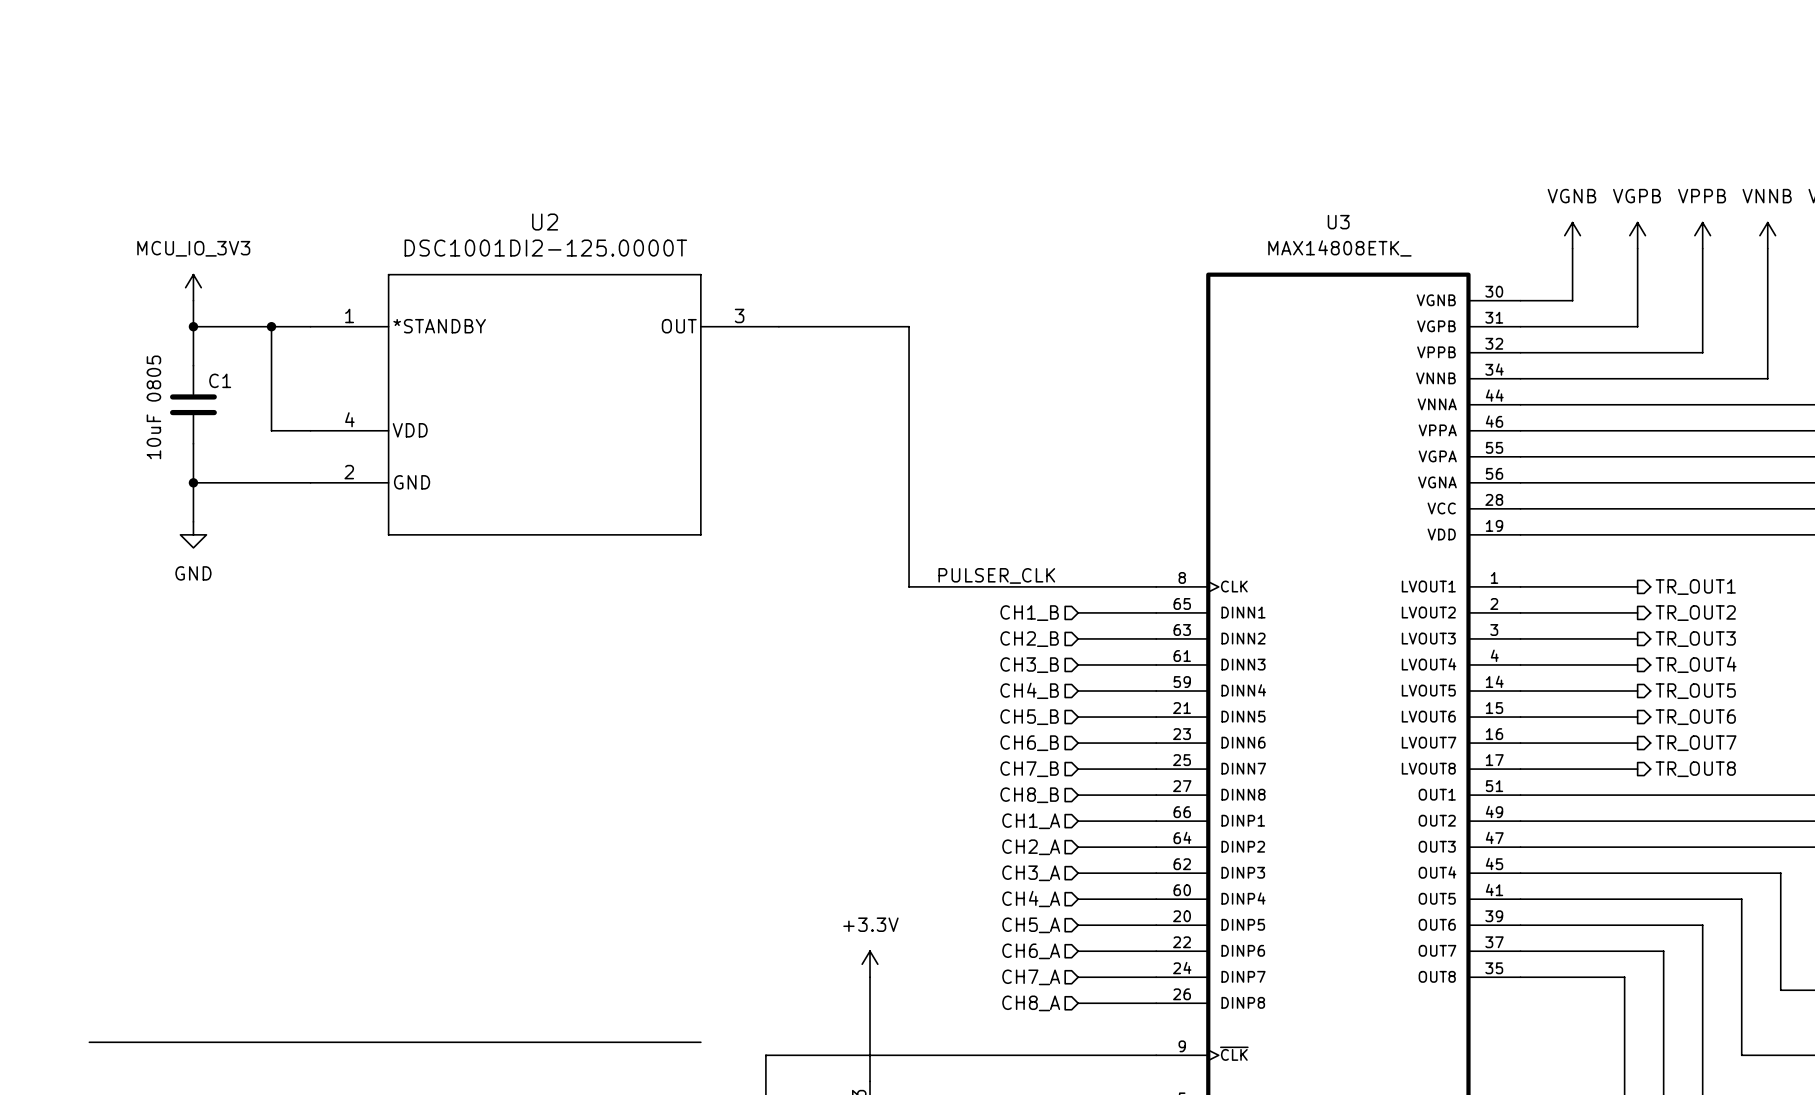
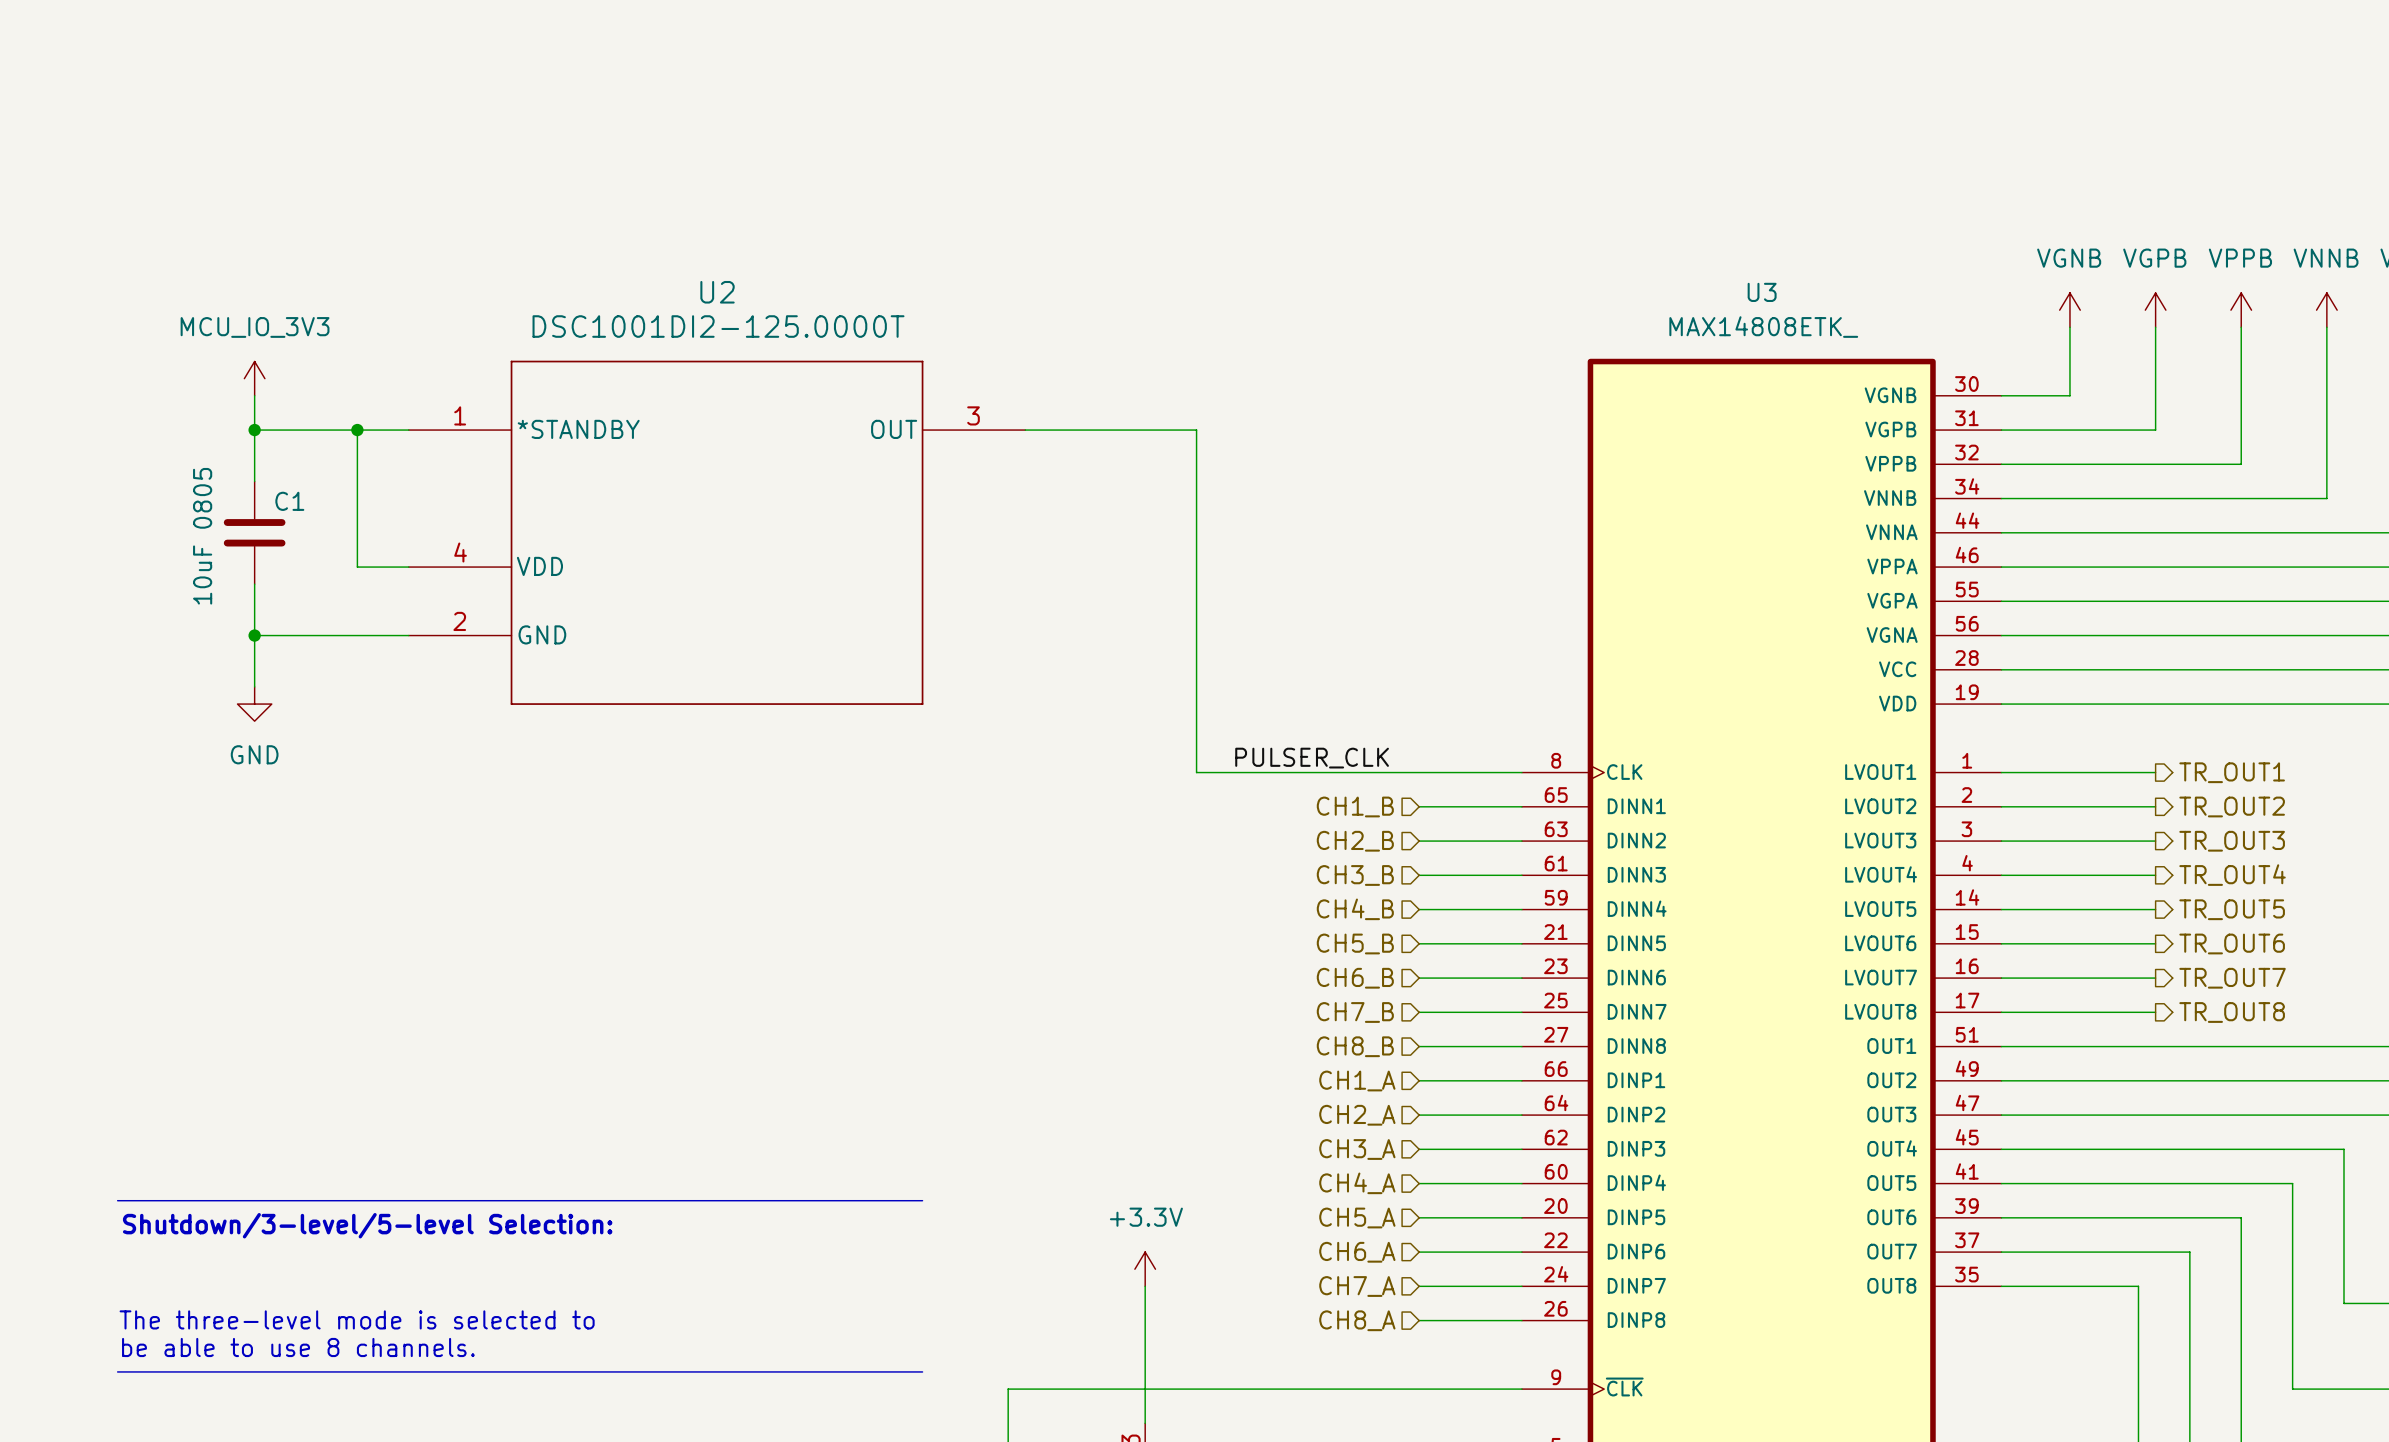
line: none -> (117, 1200) (922, 1200)
text: none -> Shutdown/3-level/5-level Selection: (367, 1225)
text: none -> The three-level mode is selected to (357, 1319)
text: none -> be able to use 8 channels. (298, 1347)

